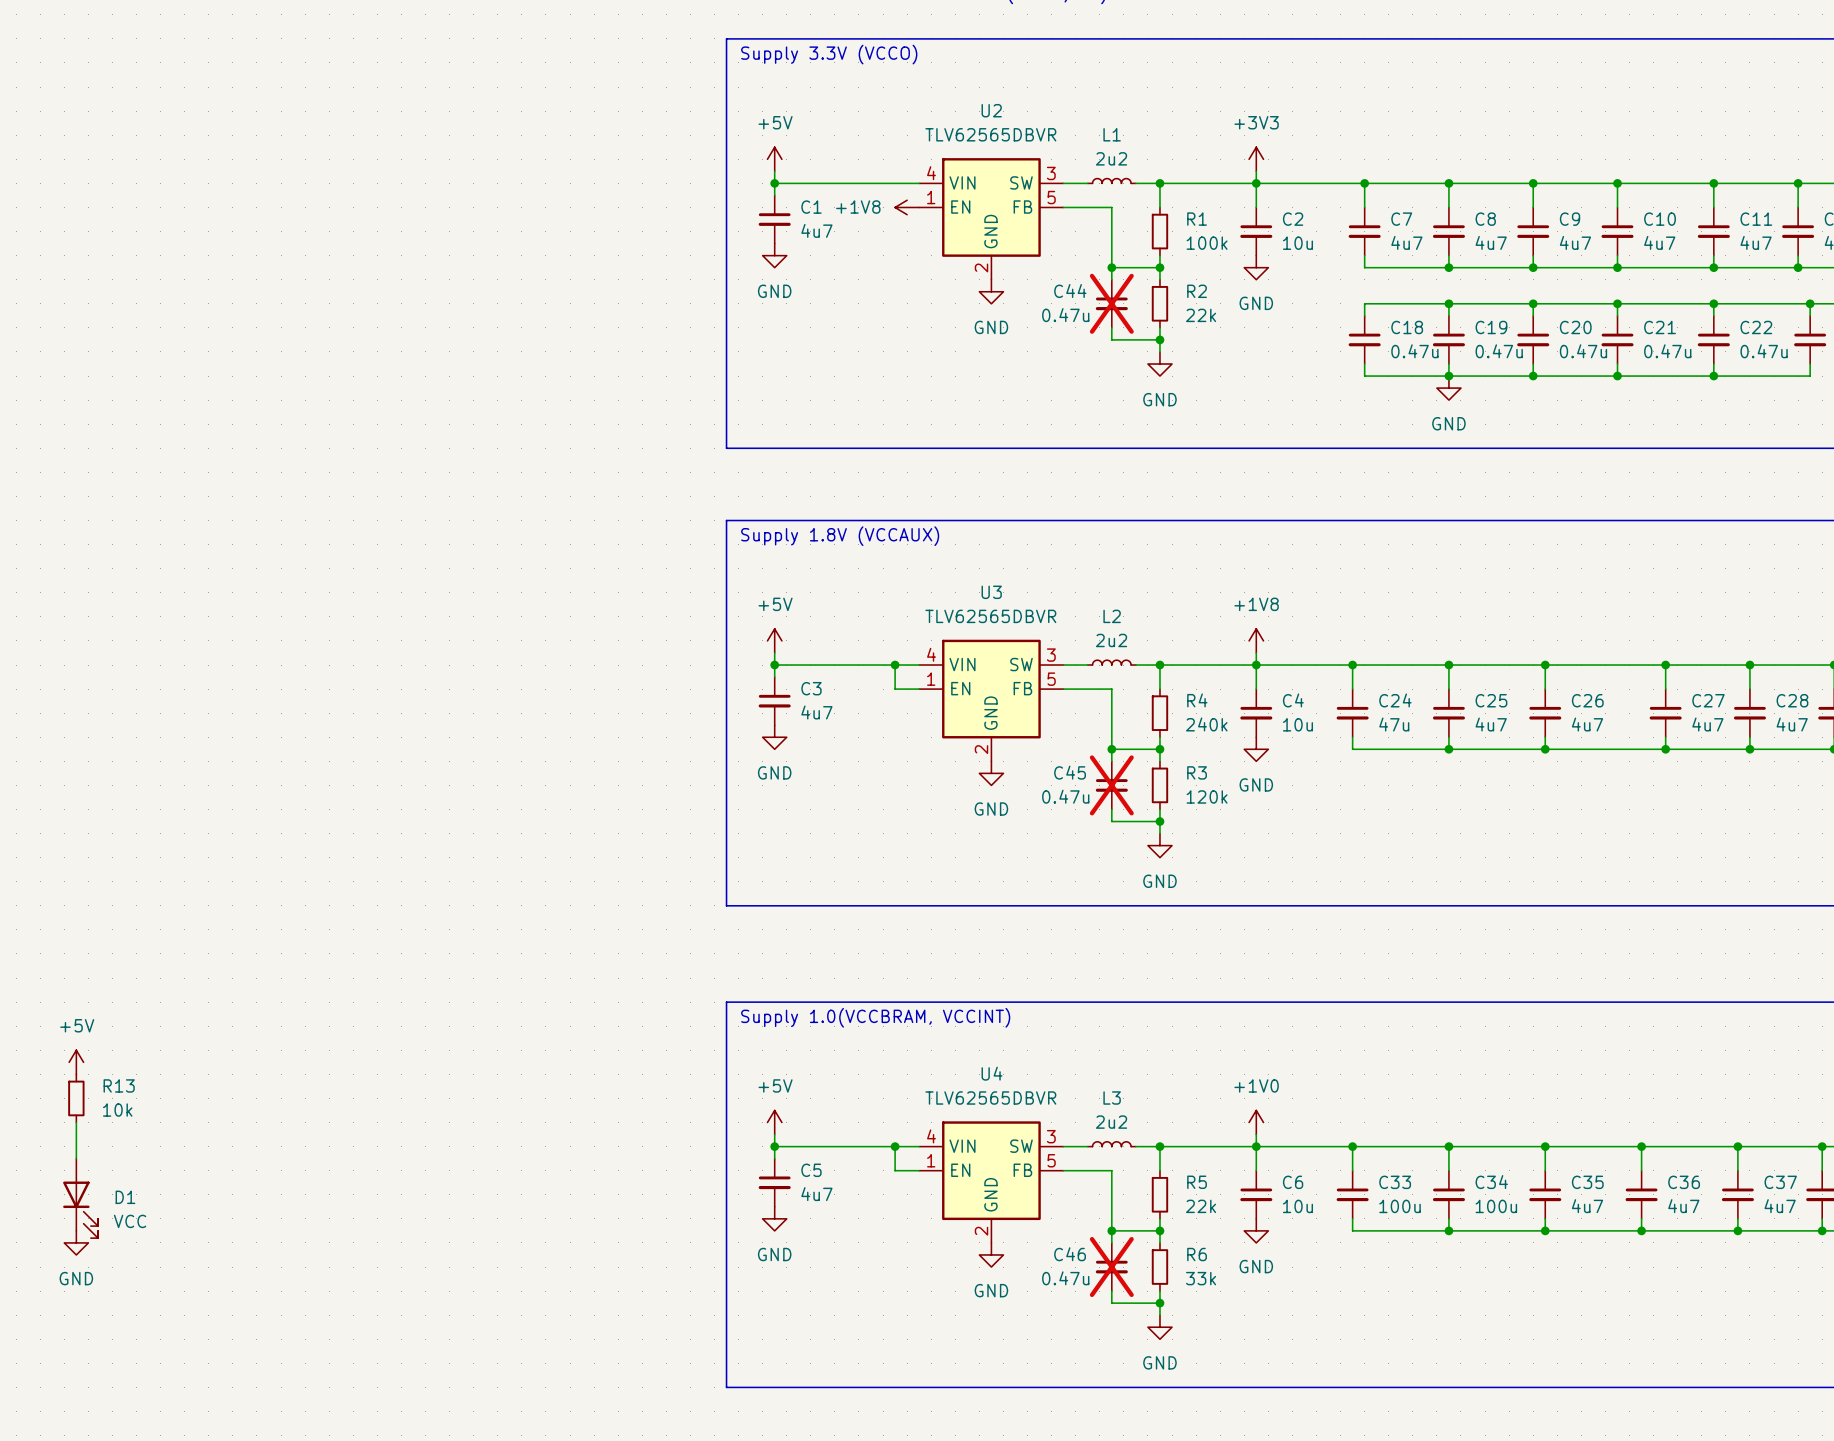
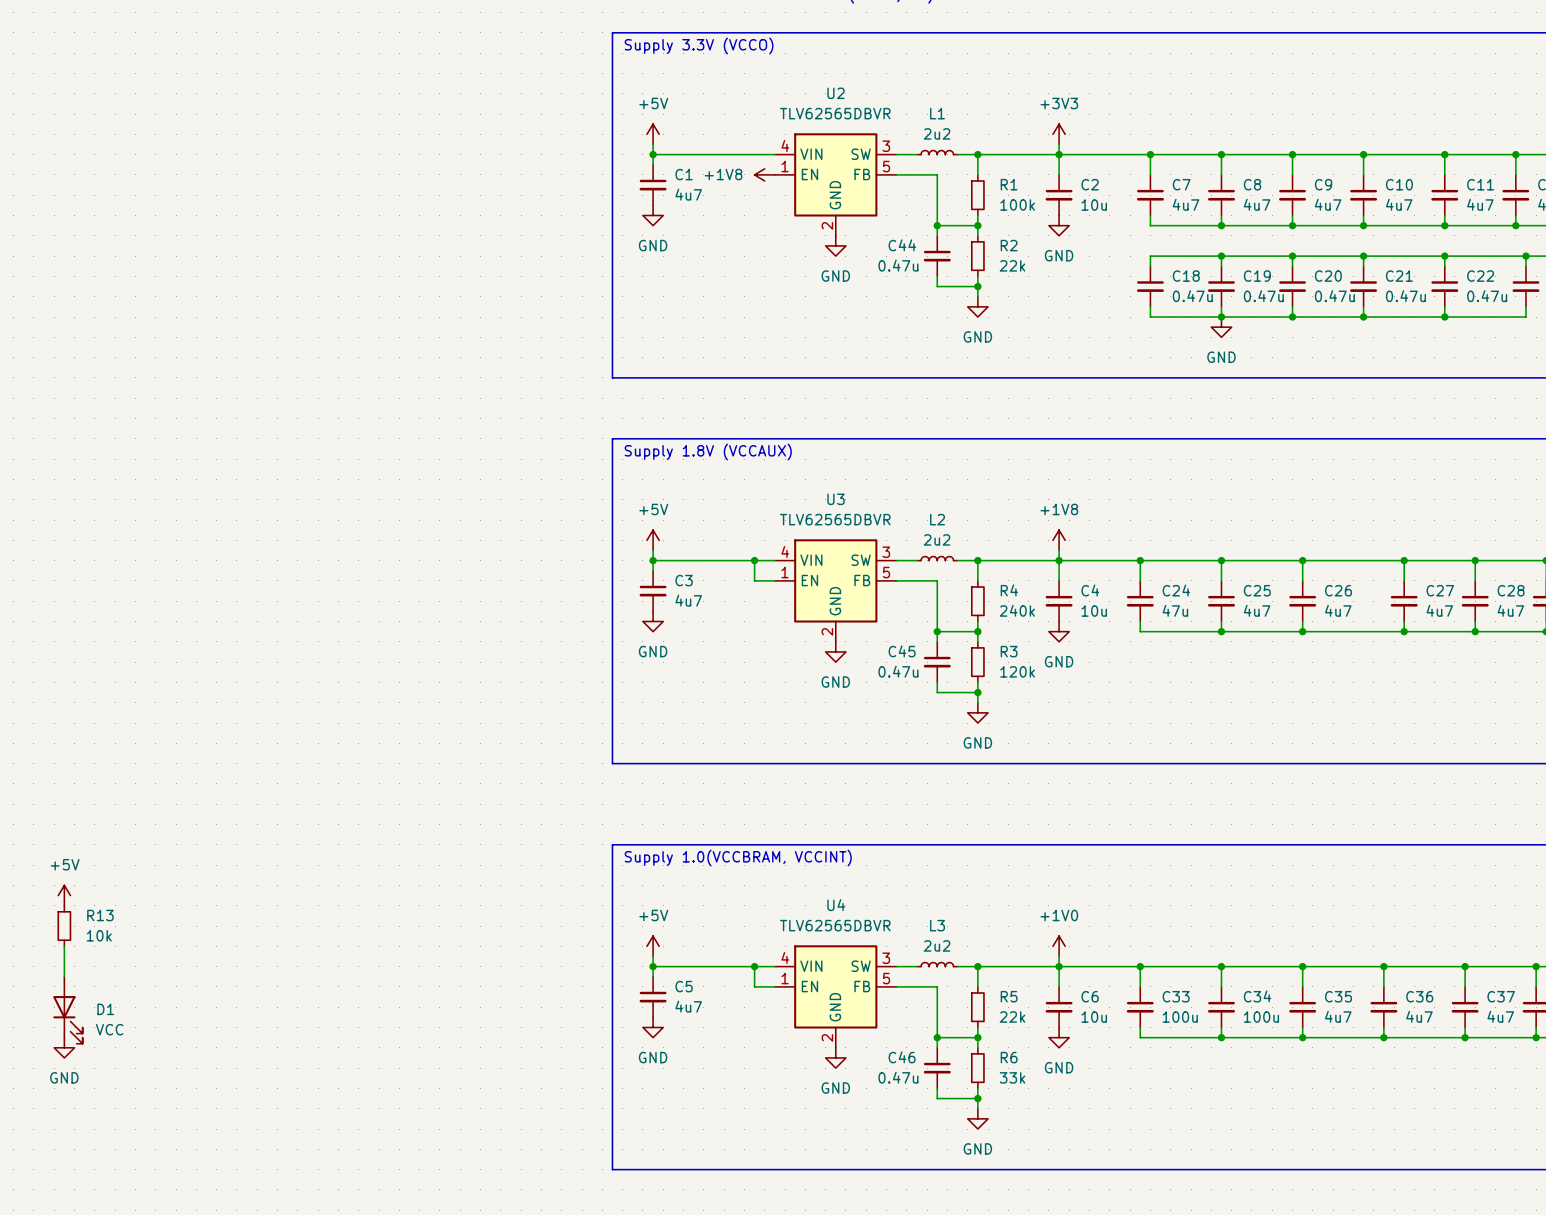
C44 do-not-place cross: (1111, 303) -> none
C45 do-not-place cross: (1111, 785) -> none
C46 do-not-place cross: (1111, 1267) -> none

